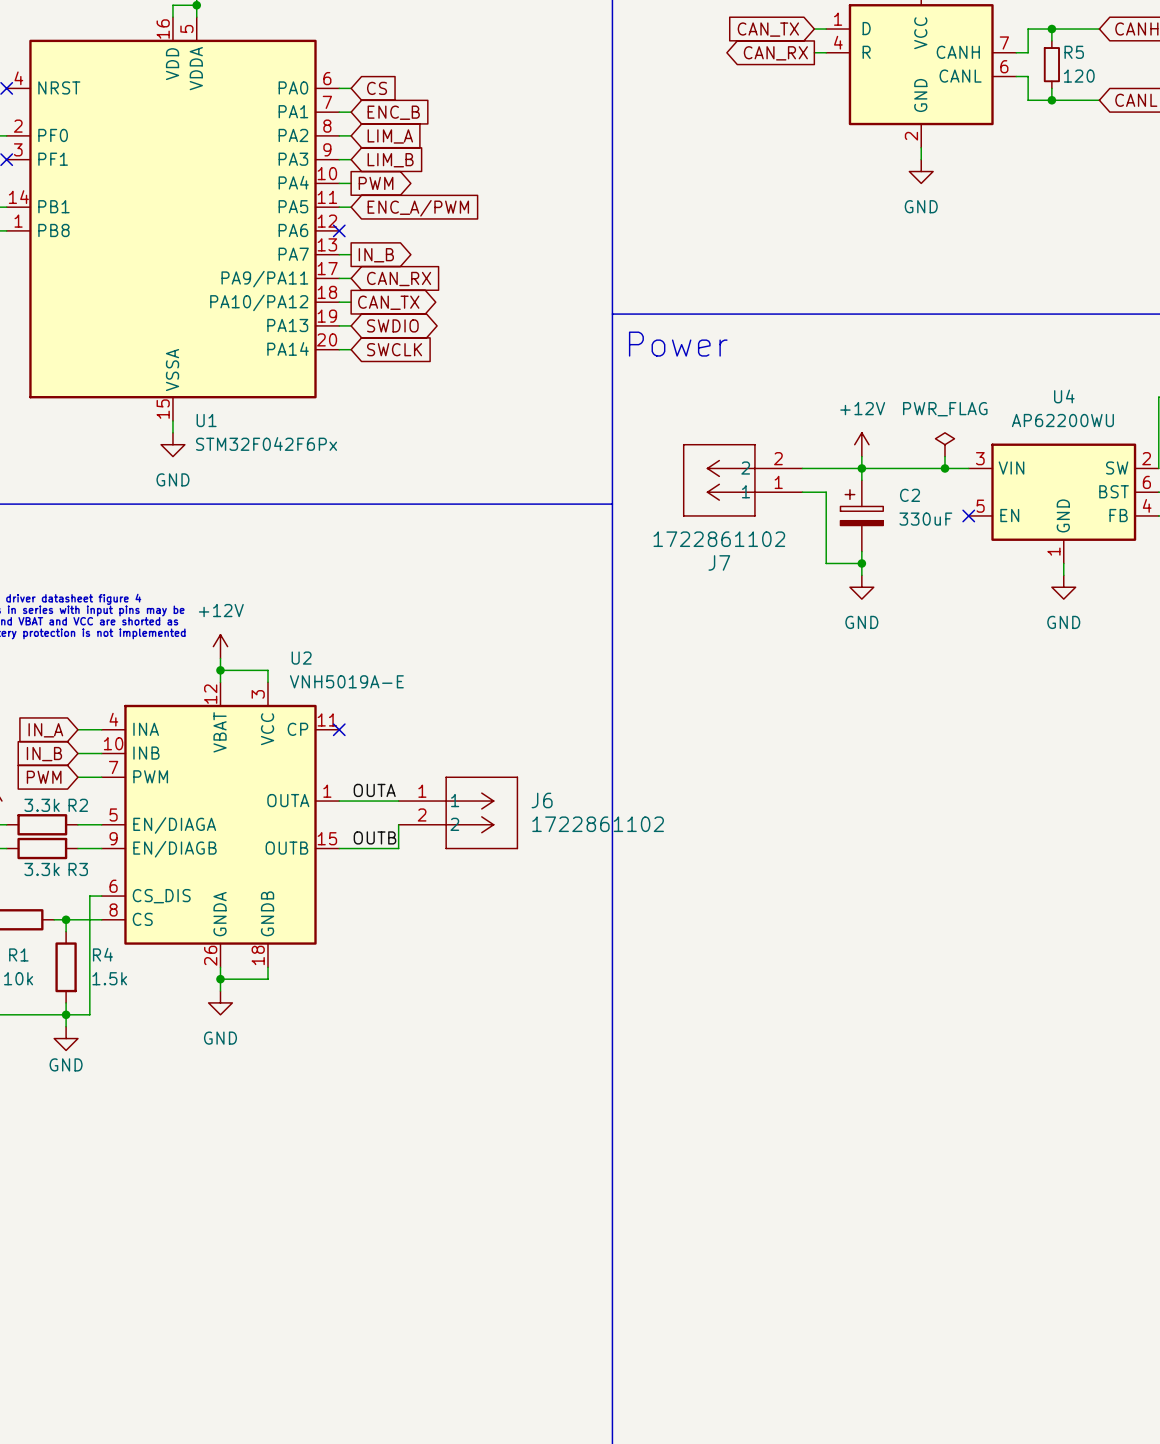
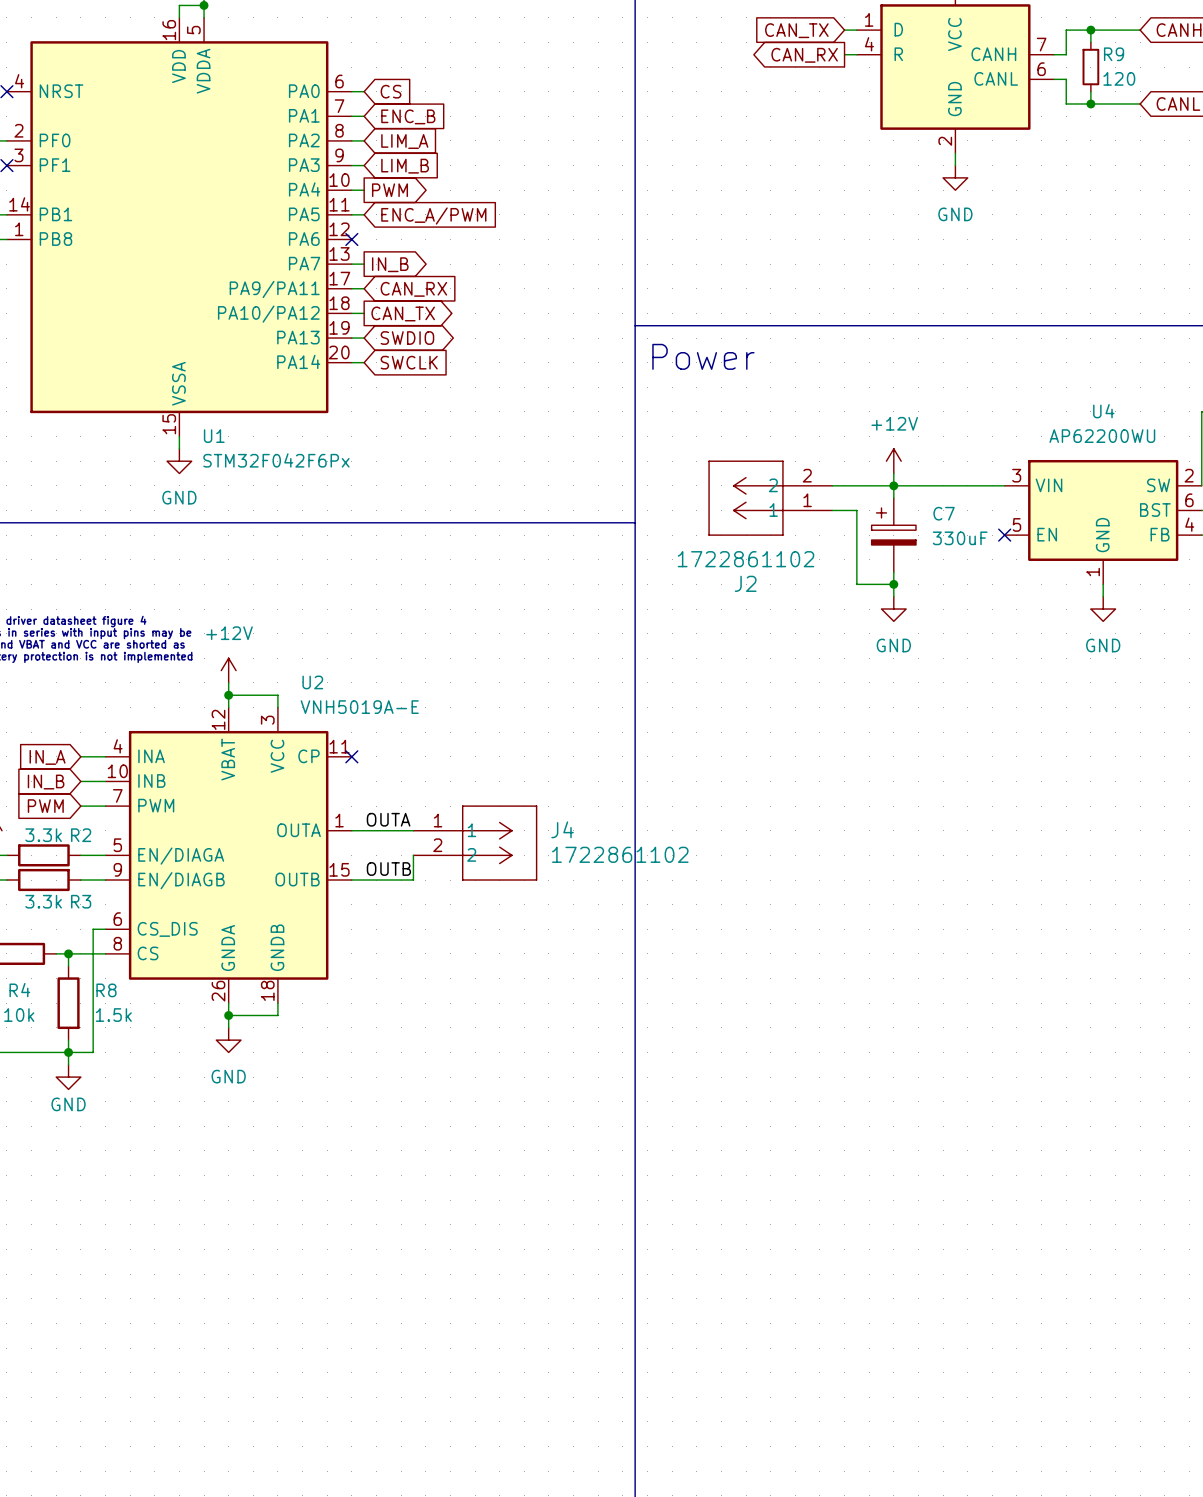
R5 name: R5 (1074, 52) -> R9 (1114, 54)
power symbol: PWR_FLAG (944, 444) -> none
wire: (944, 456) (944, 468) -> none
junction: (944, 468) -> none
C2 name: C2 (910, 495) -> C7 (944, 513)
J7 name: J7 (719, 562) -> J2 (745, 583)
J6 name: J6 (542, 800) -> J4 (562, 829)
R1 name: R1 (18, 954) -> R4 (19, 990)
R4 name: R4 (102, 954) -> R8 (106, 990)

